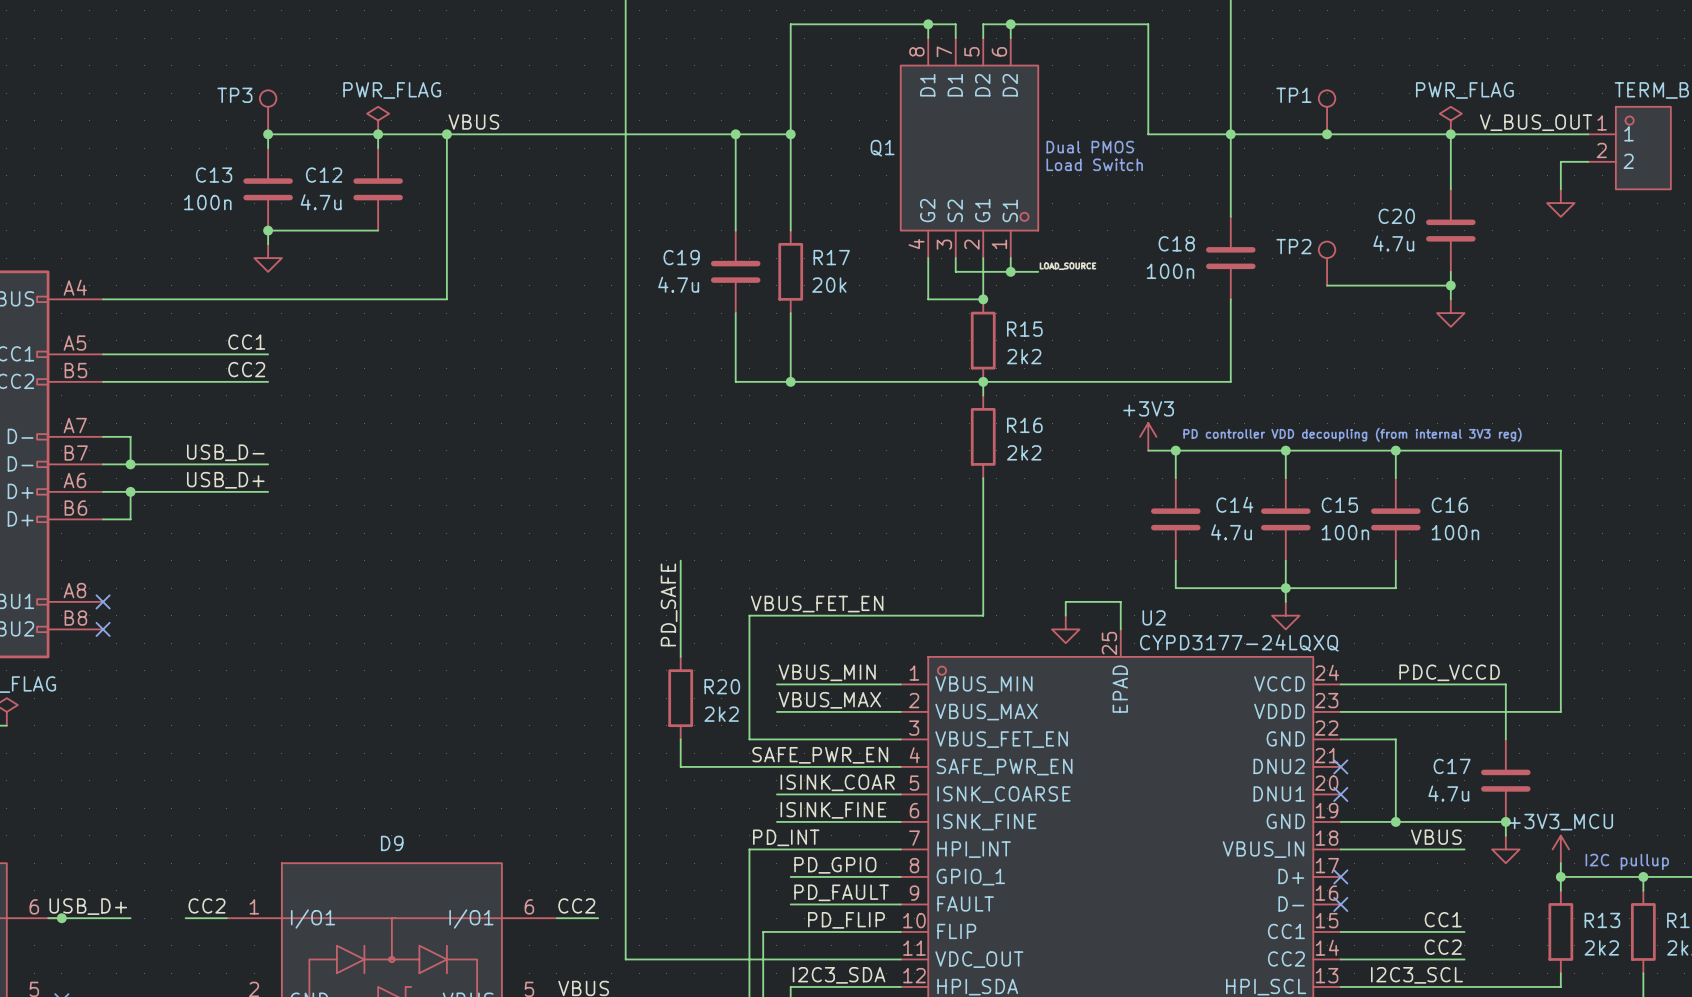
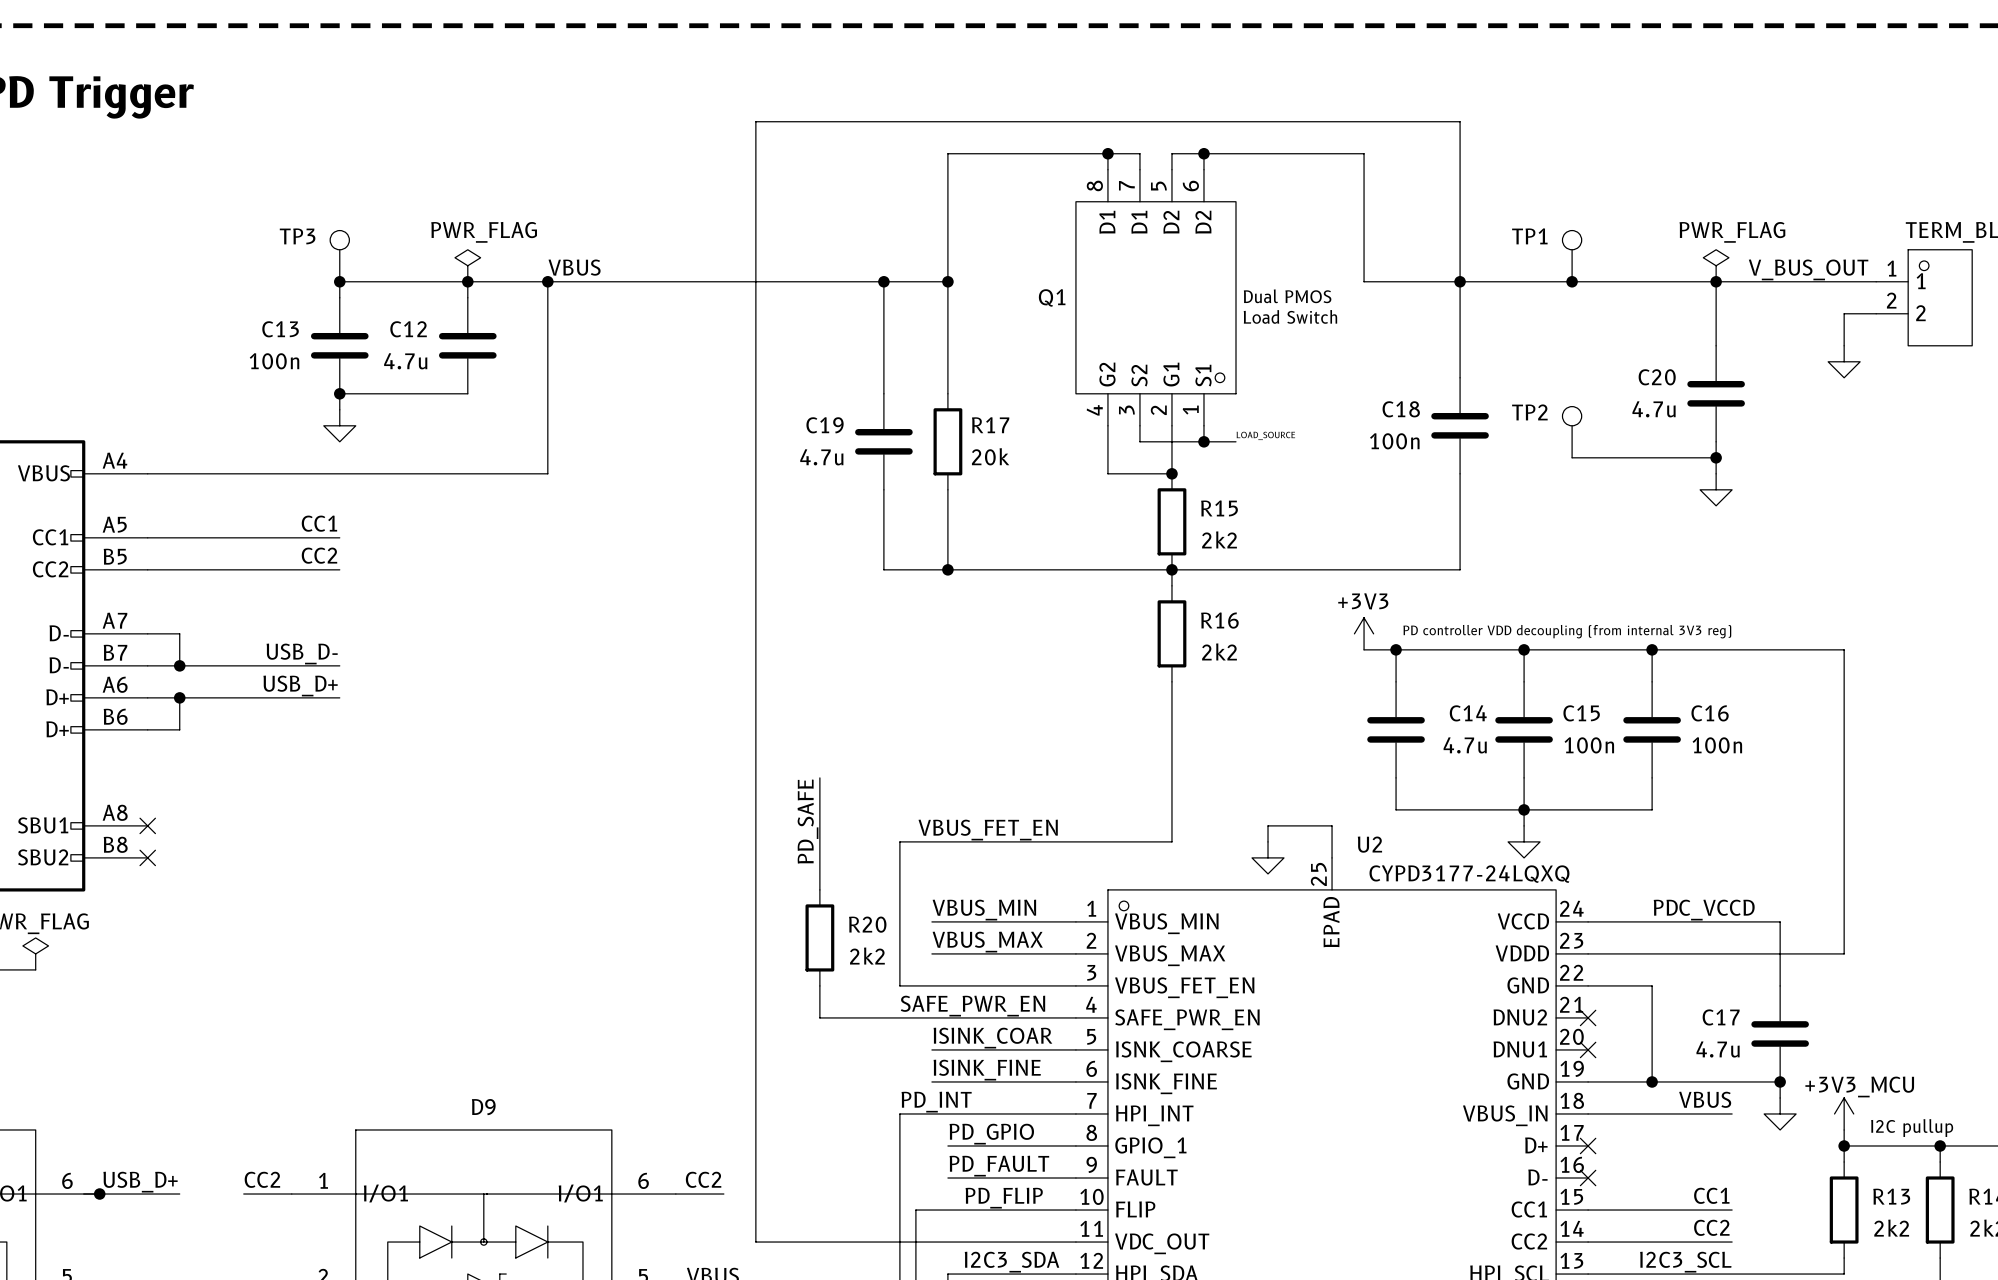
power symbol text position: +3V3_MCU (1560, 822) -> +3V3_MCU (1859, 1086)

